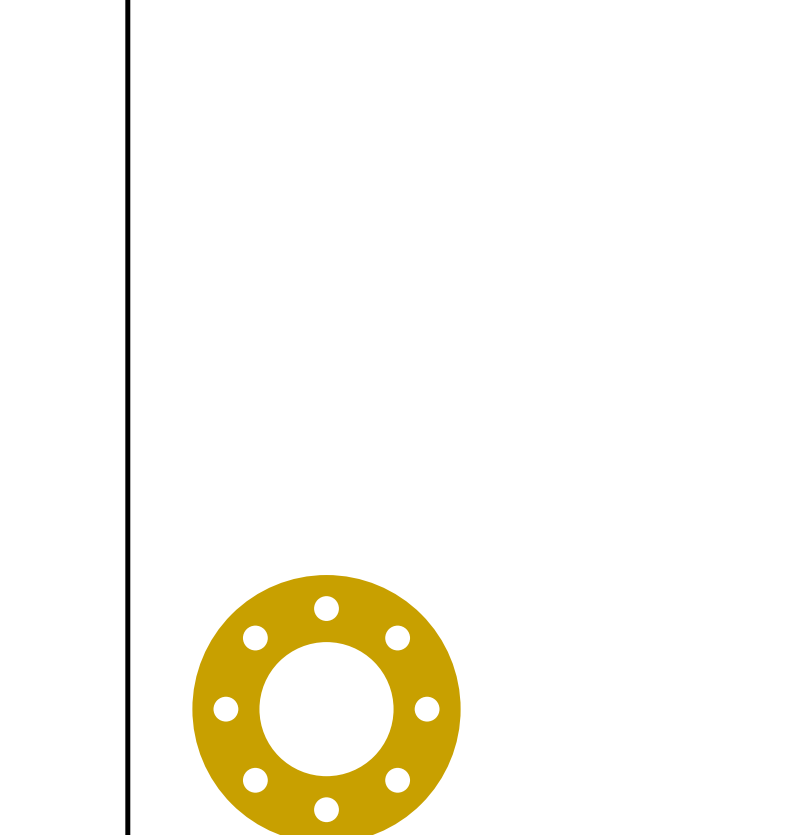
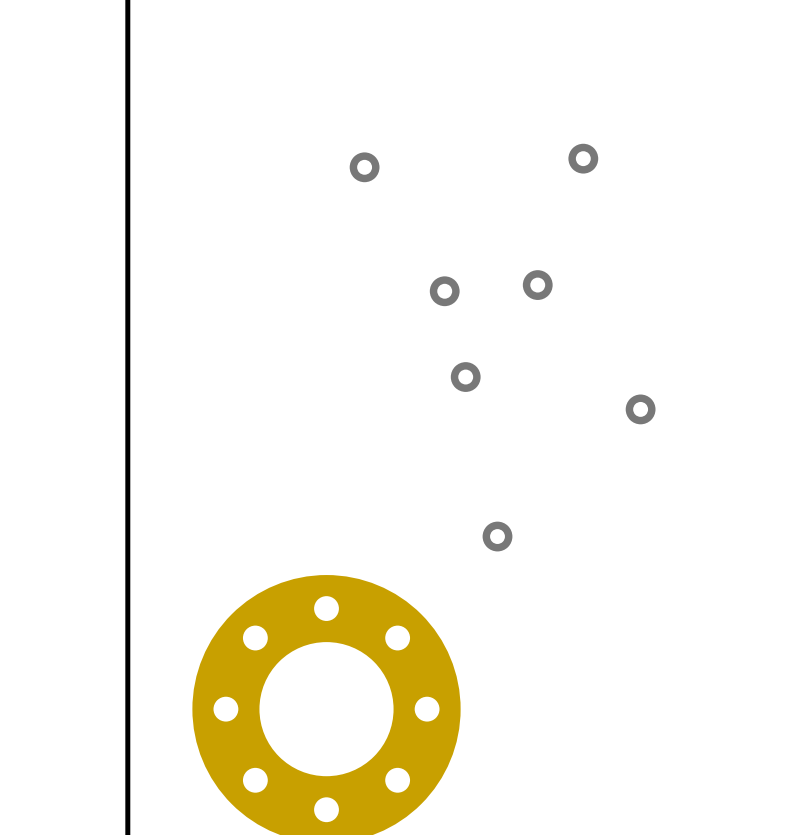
via: none -> (583, 158)
via: none -> (364, 167)
via: none -> (537, 285)
via: none -> (444, 291)
via: none -> (465, 377)
via: none -> (640, 409)
via: none -> (497, 536)

